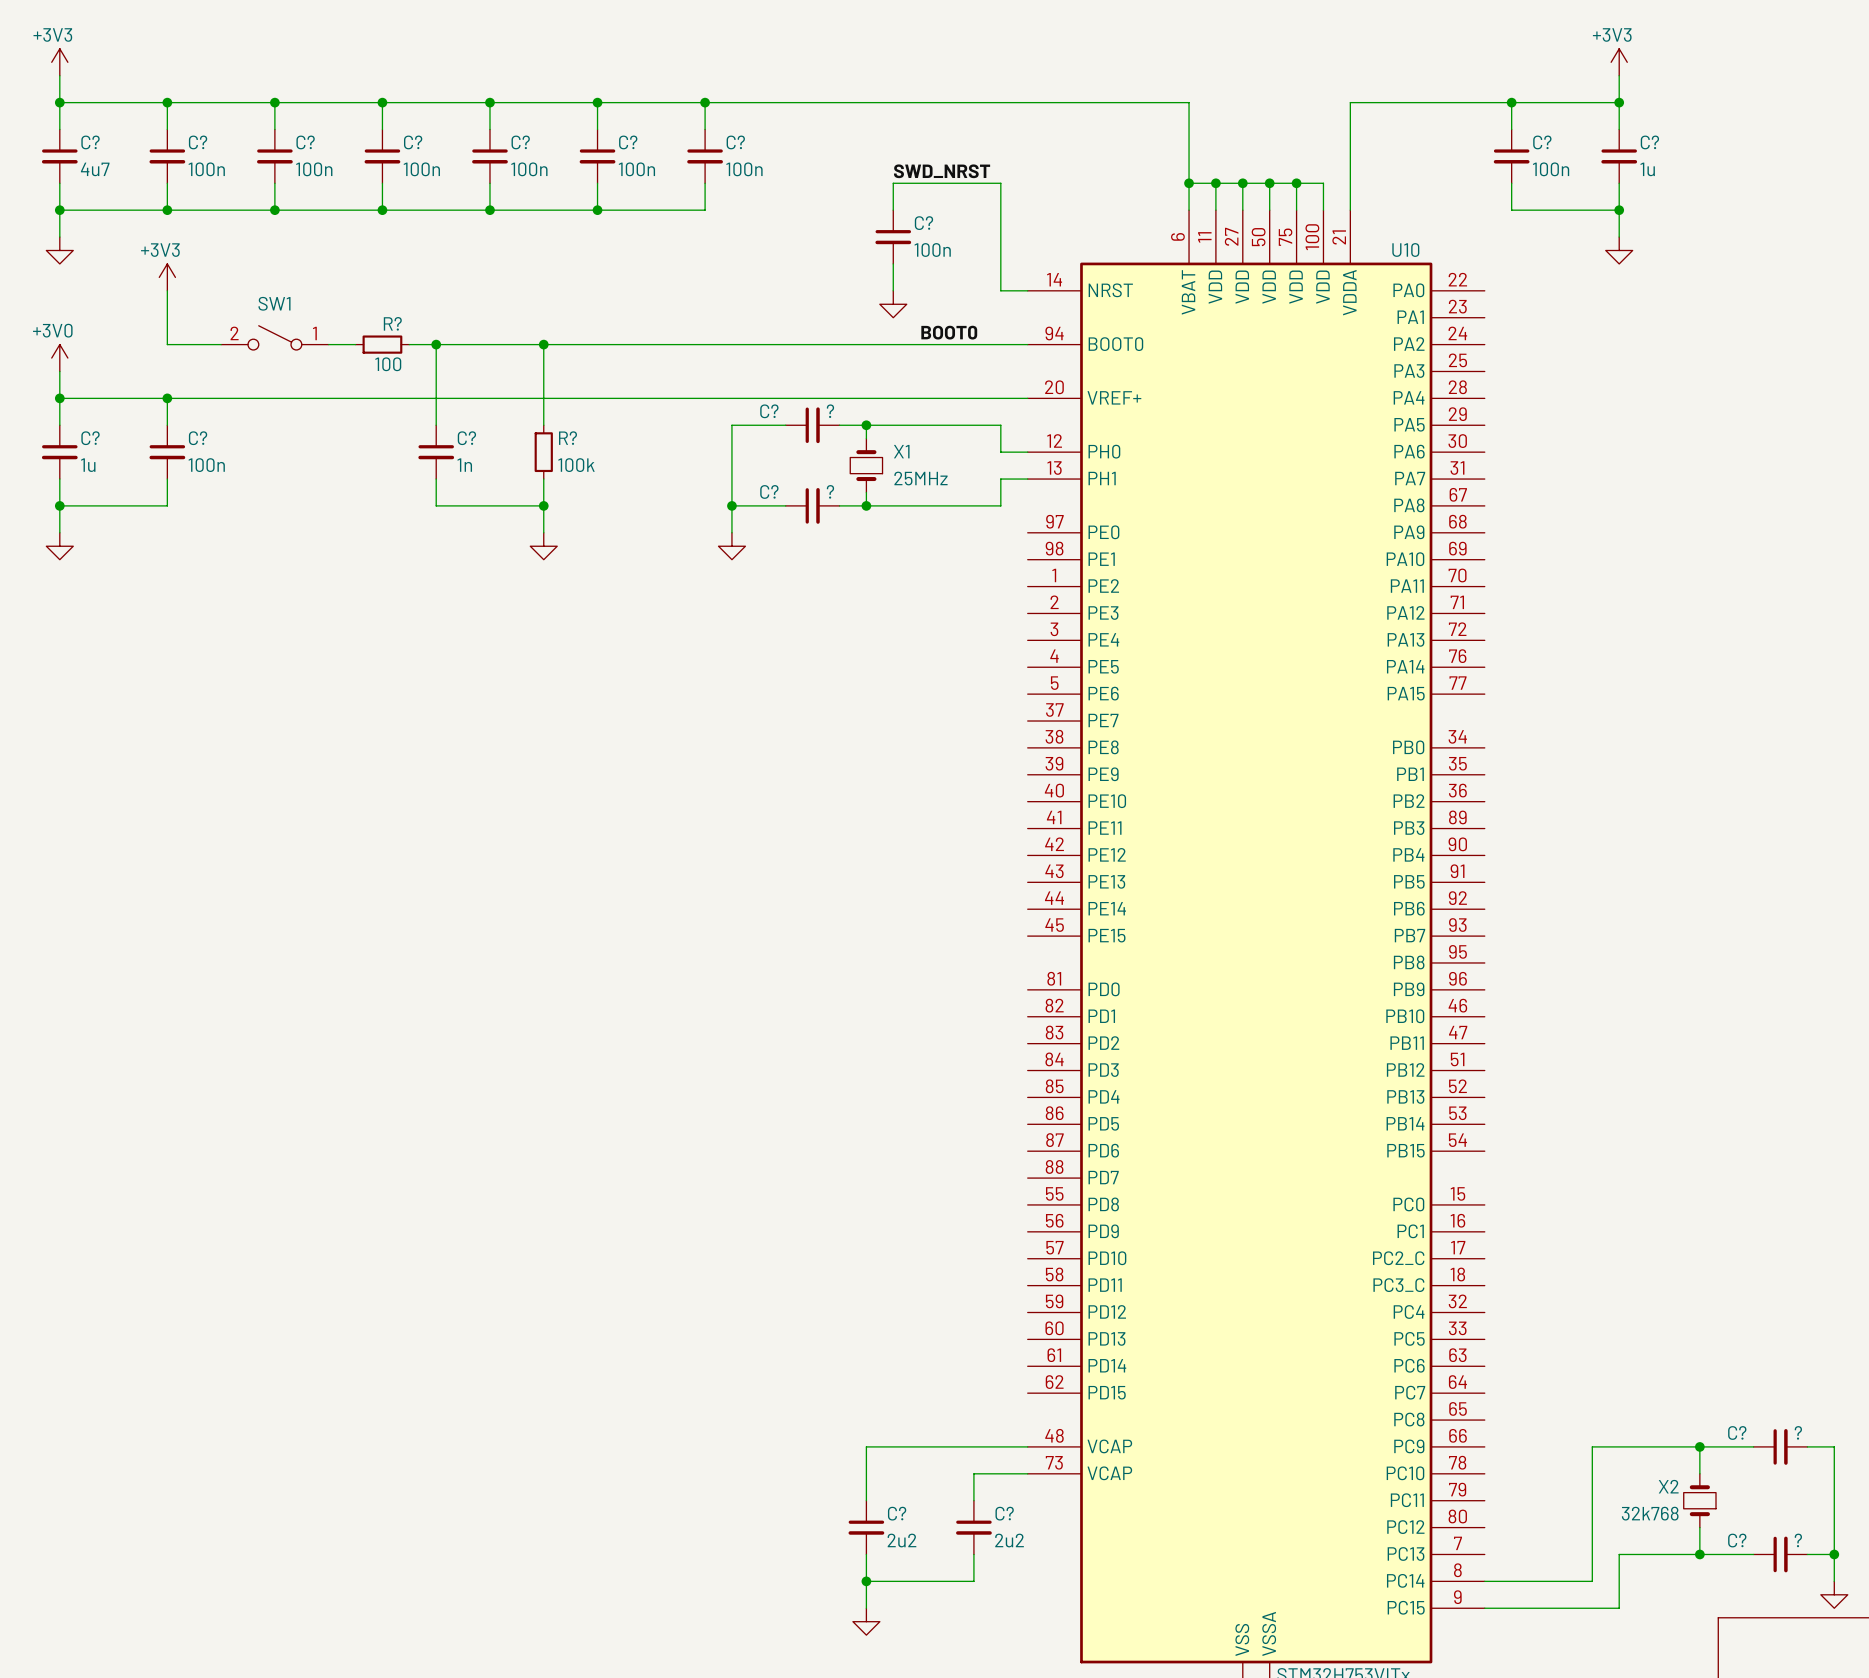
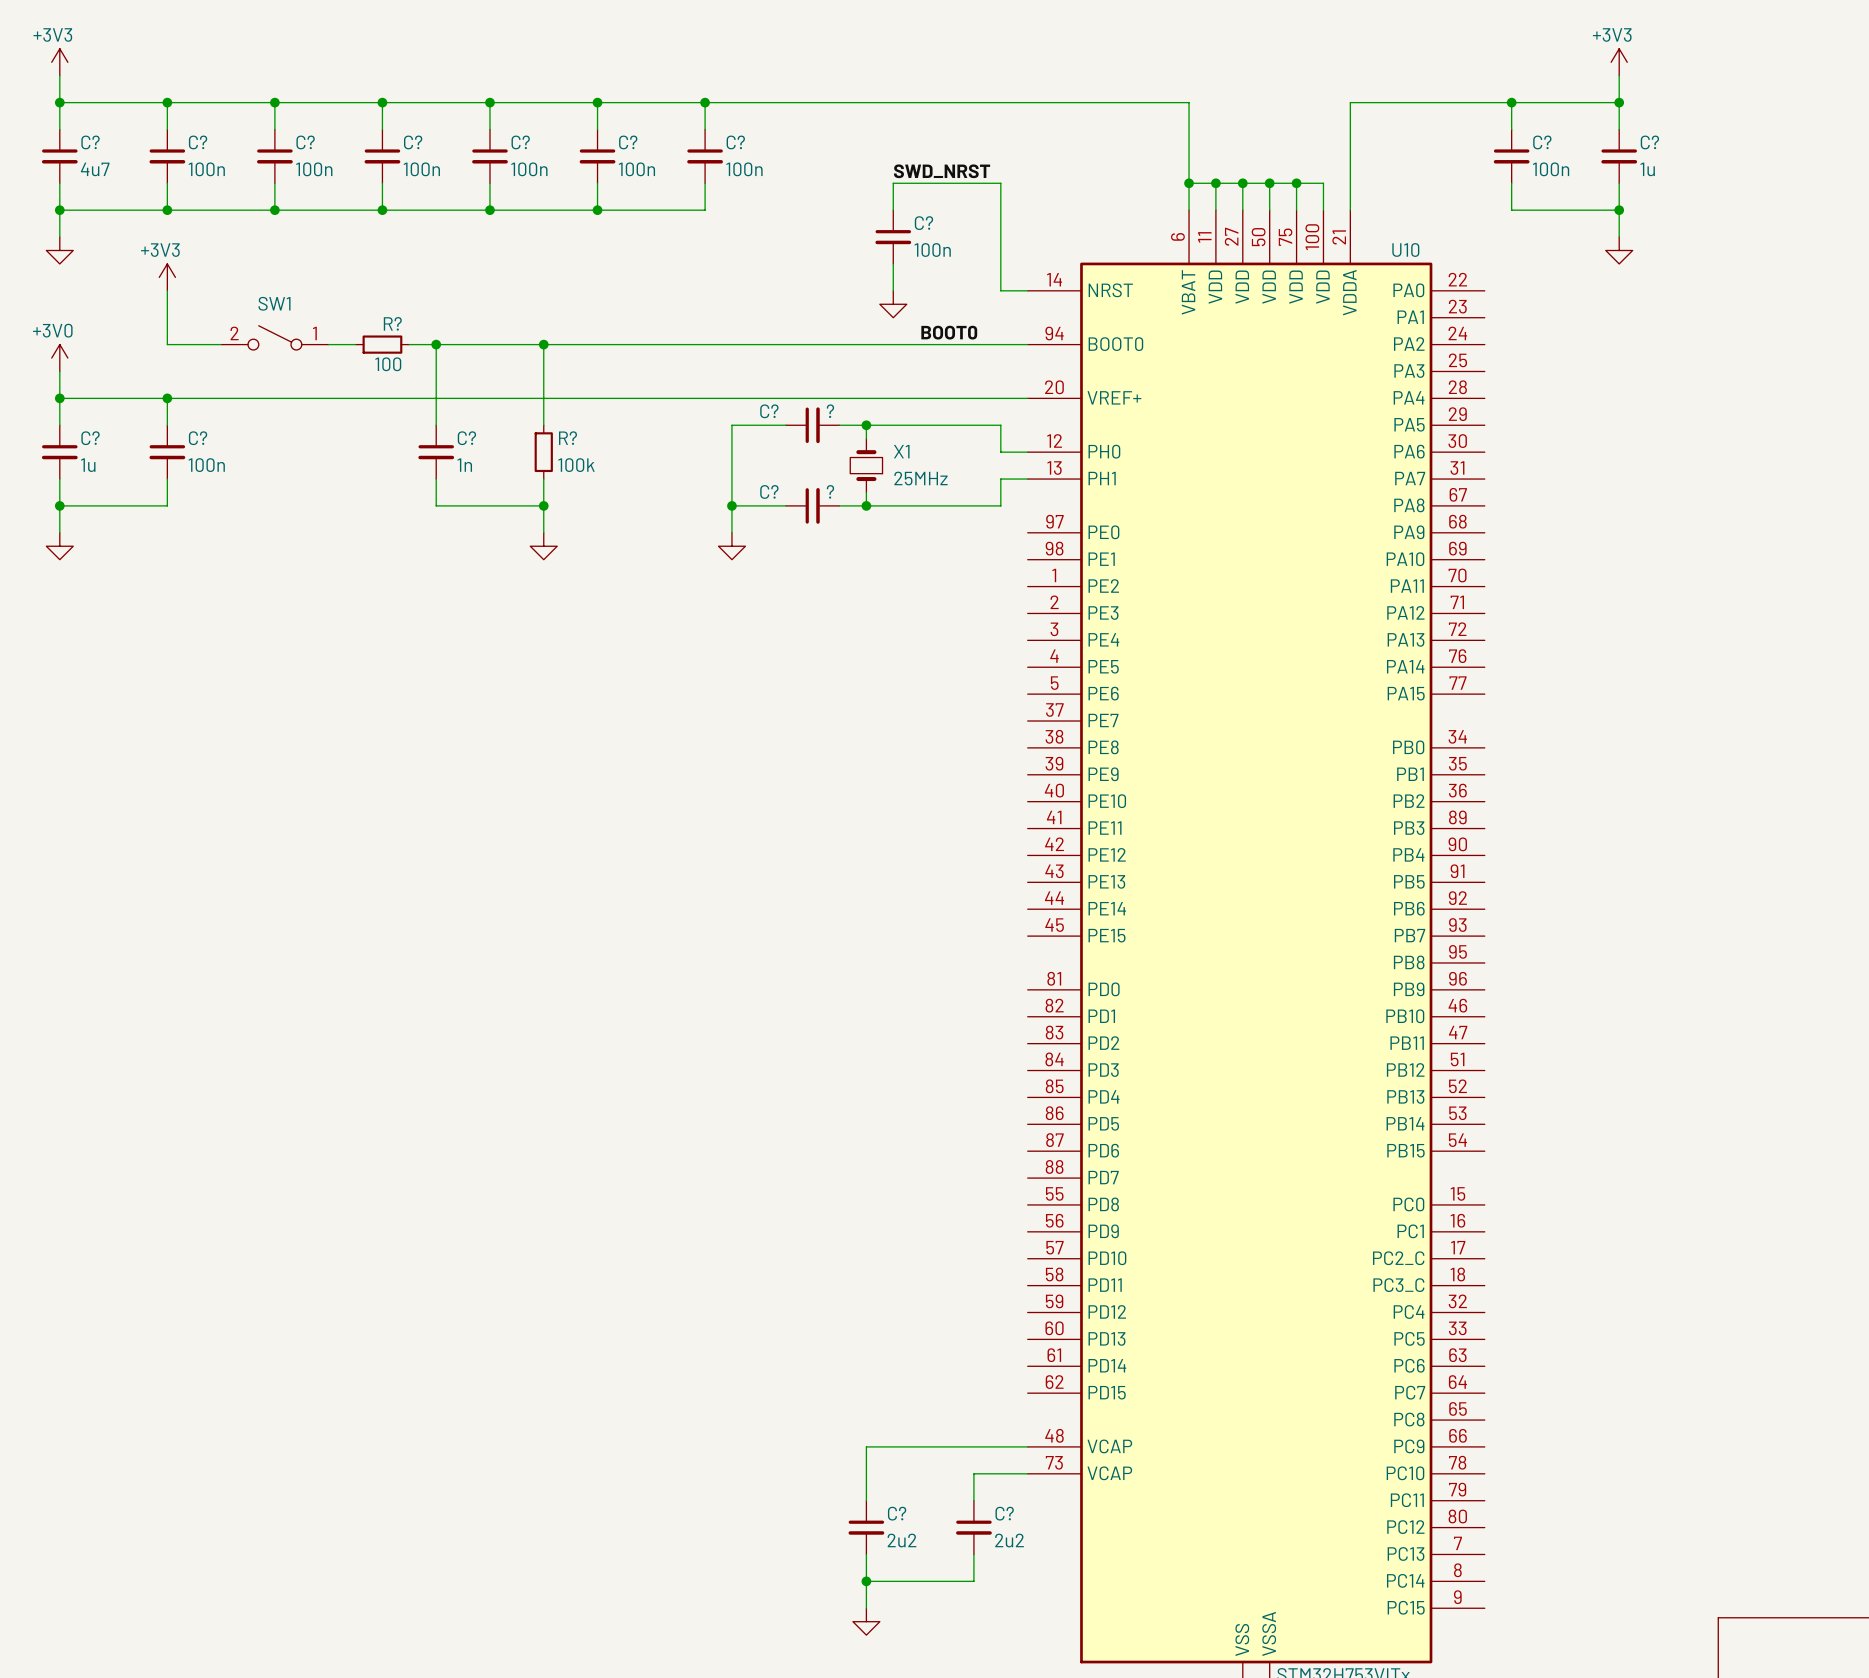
wire: (1699, 1446) (1699, 1473) -> none
junction: (1699, 1446) -> none
wire: (1753, 1446) (1592, 1446) (1592, 1581) (1484, 1581) -> none
C?: ? (1780, 1446) -> none
wire: (1807, 1446) (1834, 1446) (1834, 1581) -> none
X2: 32k768 (1699, 1500) -> none
wire: (1699, 1527) (1699, 1554) -> none
junction: (1699, 1554) -> none
wire: (1753, 1554) (1619, 1554) (1619, 1608) (1484, 1608) -> none
C?: ? (1780, 1554) -> none
wire: (1807, 1554) (1834, 1554) -> none
junction: (1834, 1554) -> none
power symbol: (1834, 1594) -> none

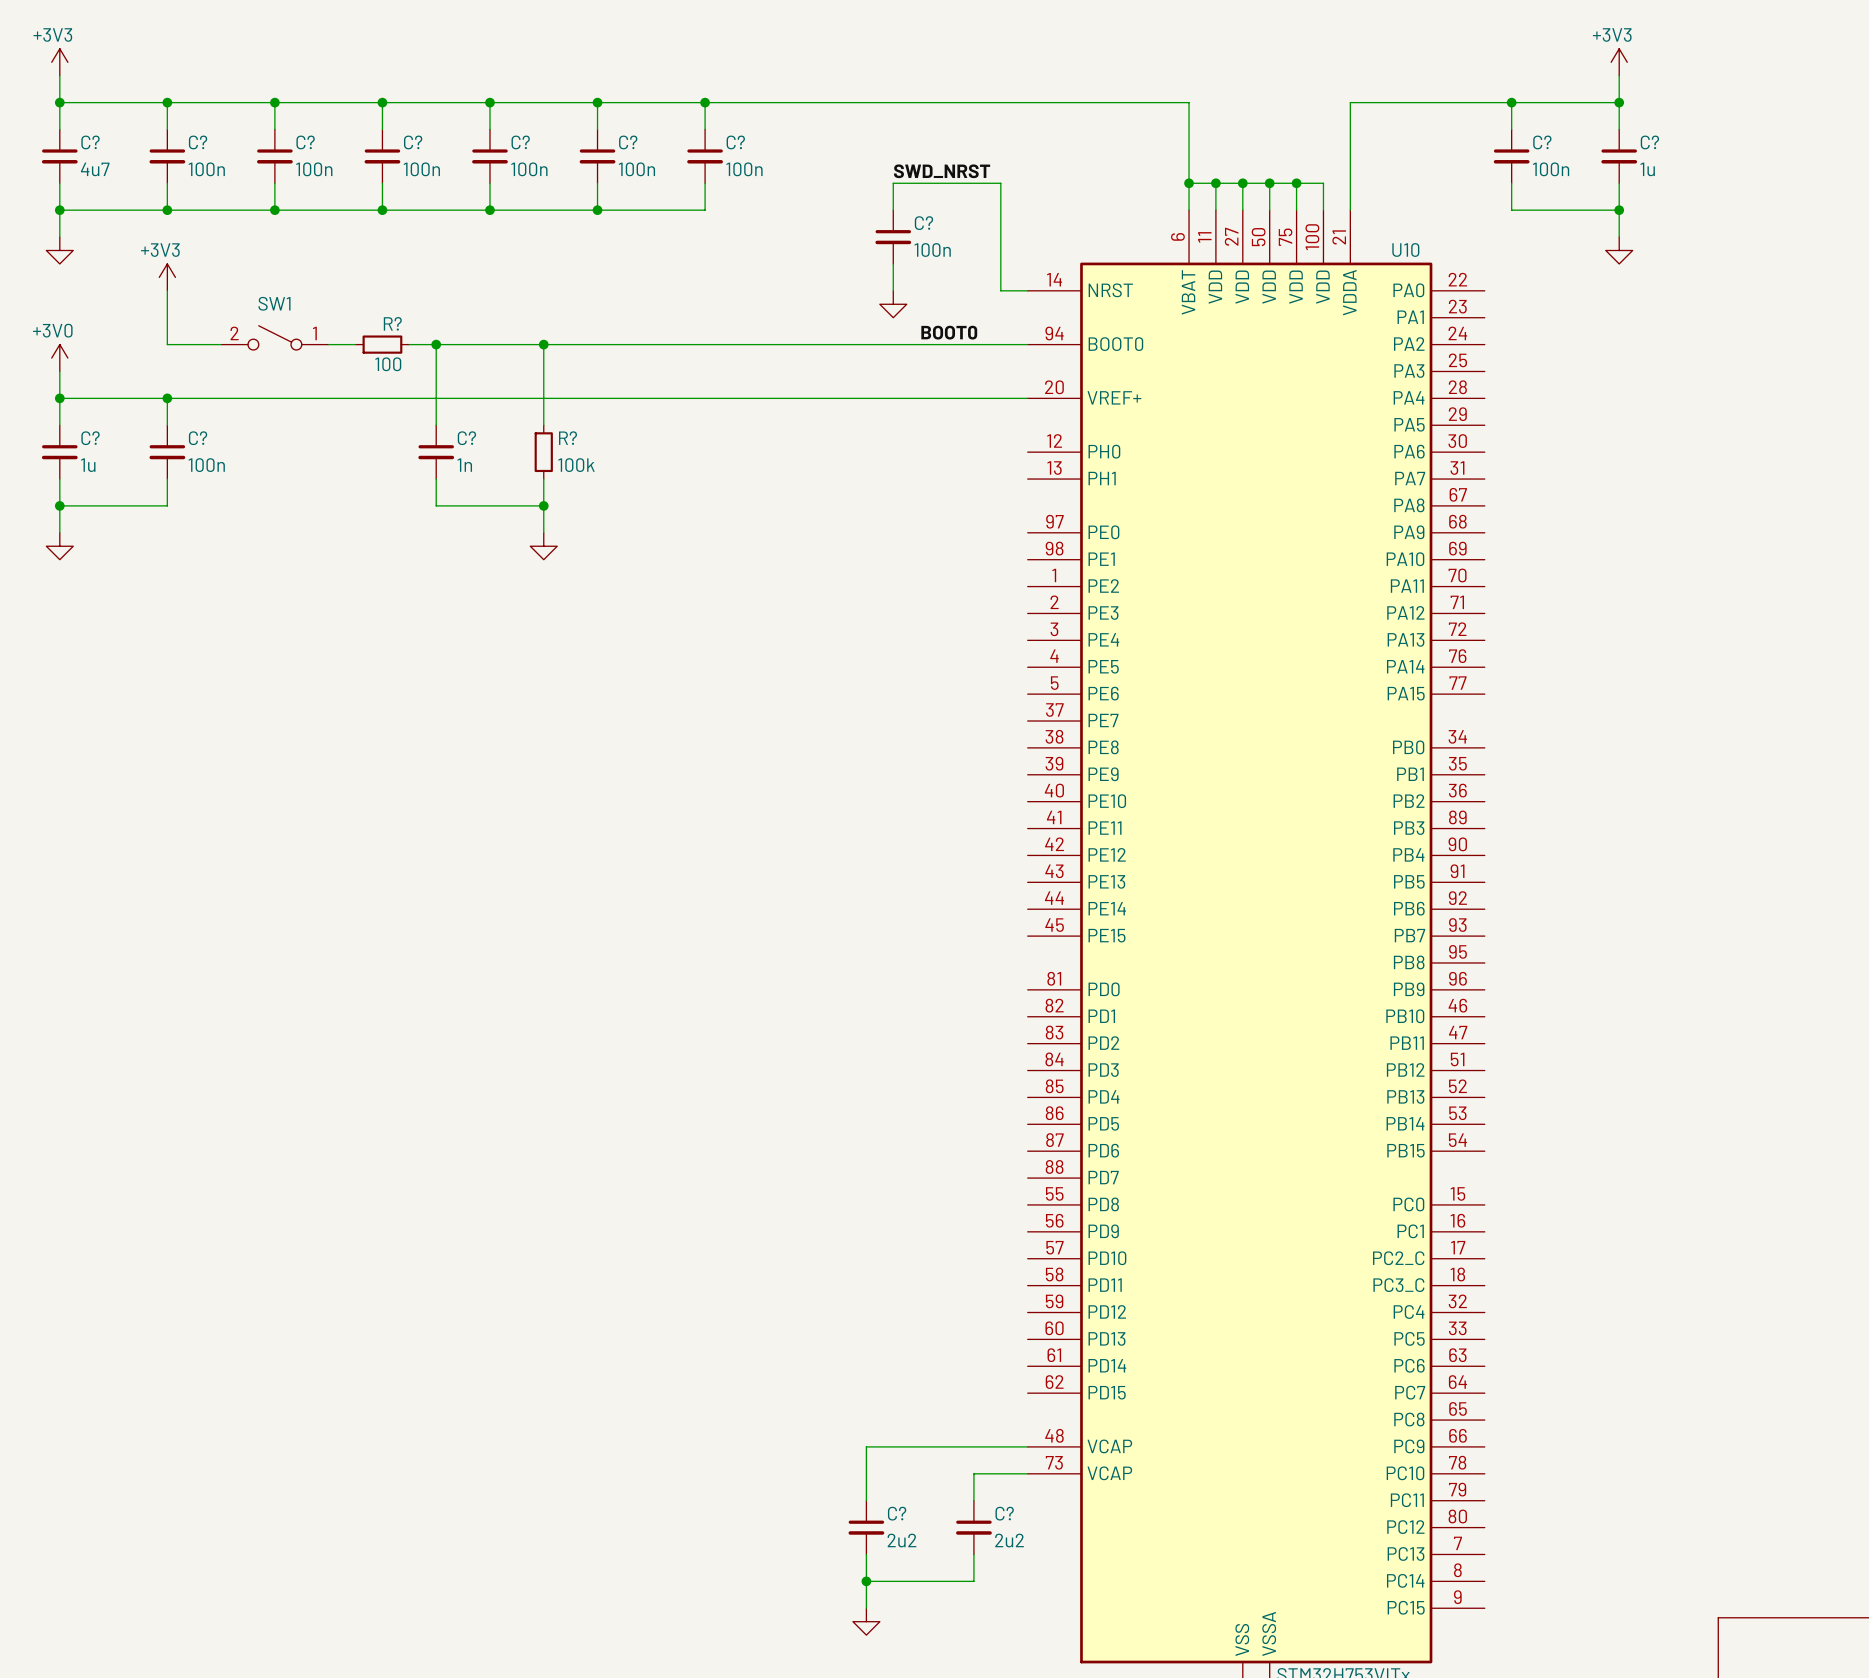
wire: (785, 425) (731, 425) (731, 532) -> none
C?: ? (812, 425) -> none
wire: (839, 425) (1000, 425) (1000, 452) (1027, 452) -> none
wire: (866, 425) (866, 438) -> none
junction: (866, 425) -> none
X1: 25MHz (866, 465) -> none
wire: (1027, 479) (1000, 479) (1000, 505) (839, 505) -> none
wire: (866, 492) (866, 505) -> none
wire: (731, 505) (785, 505) -> none
junction: (731, 505) -> none
C?: ? (812, 505) -> none
junction: (866, 505) -> none
power symbol: (731, 546) -> none

